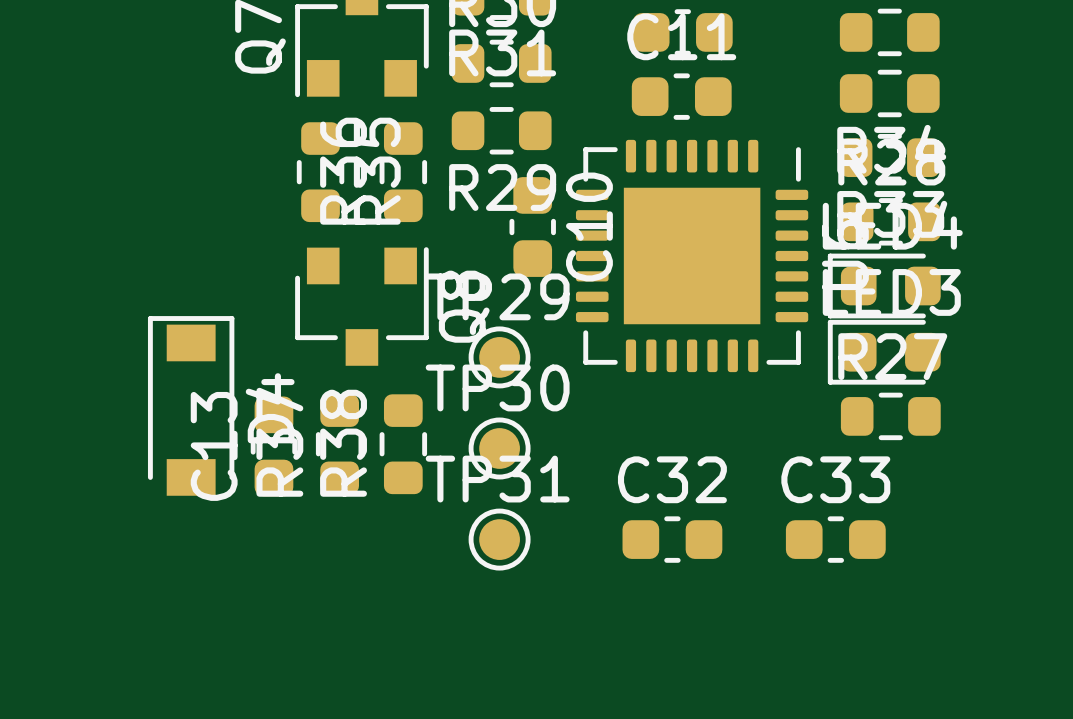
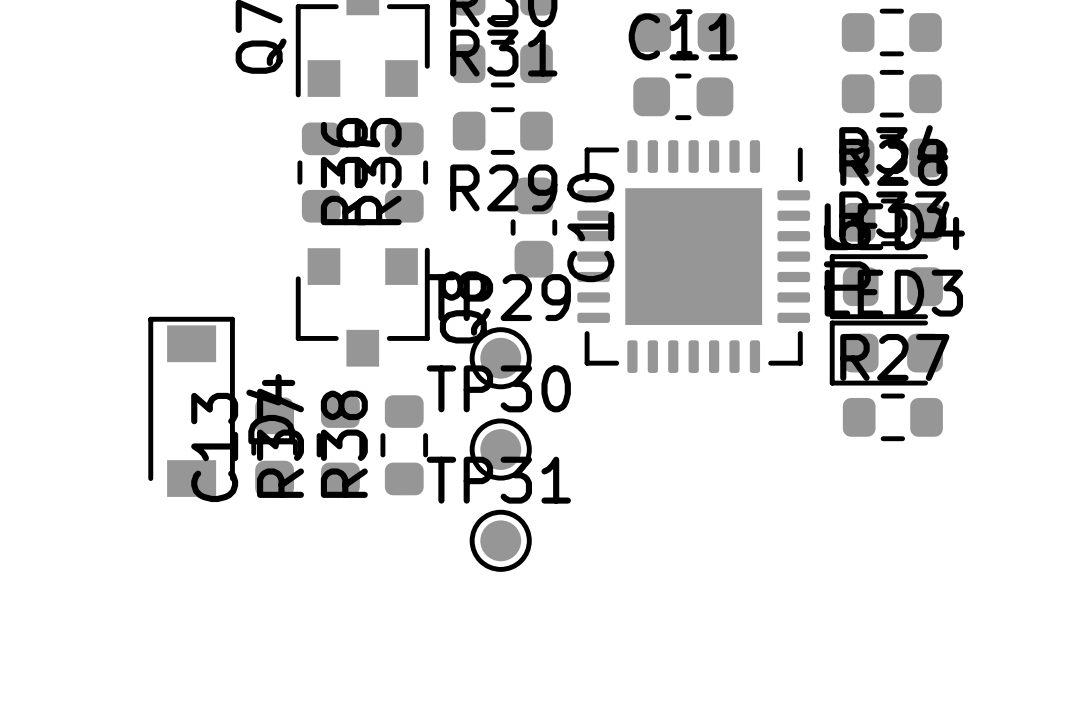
C32: (672, 539) -> none
C33: (835, 539) -> none

